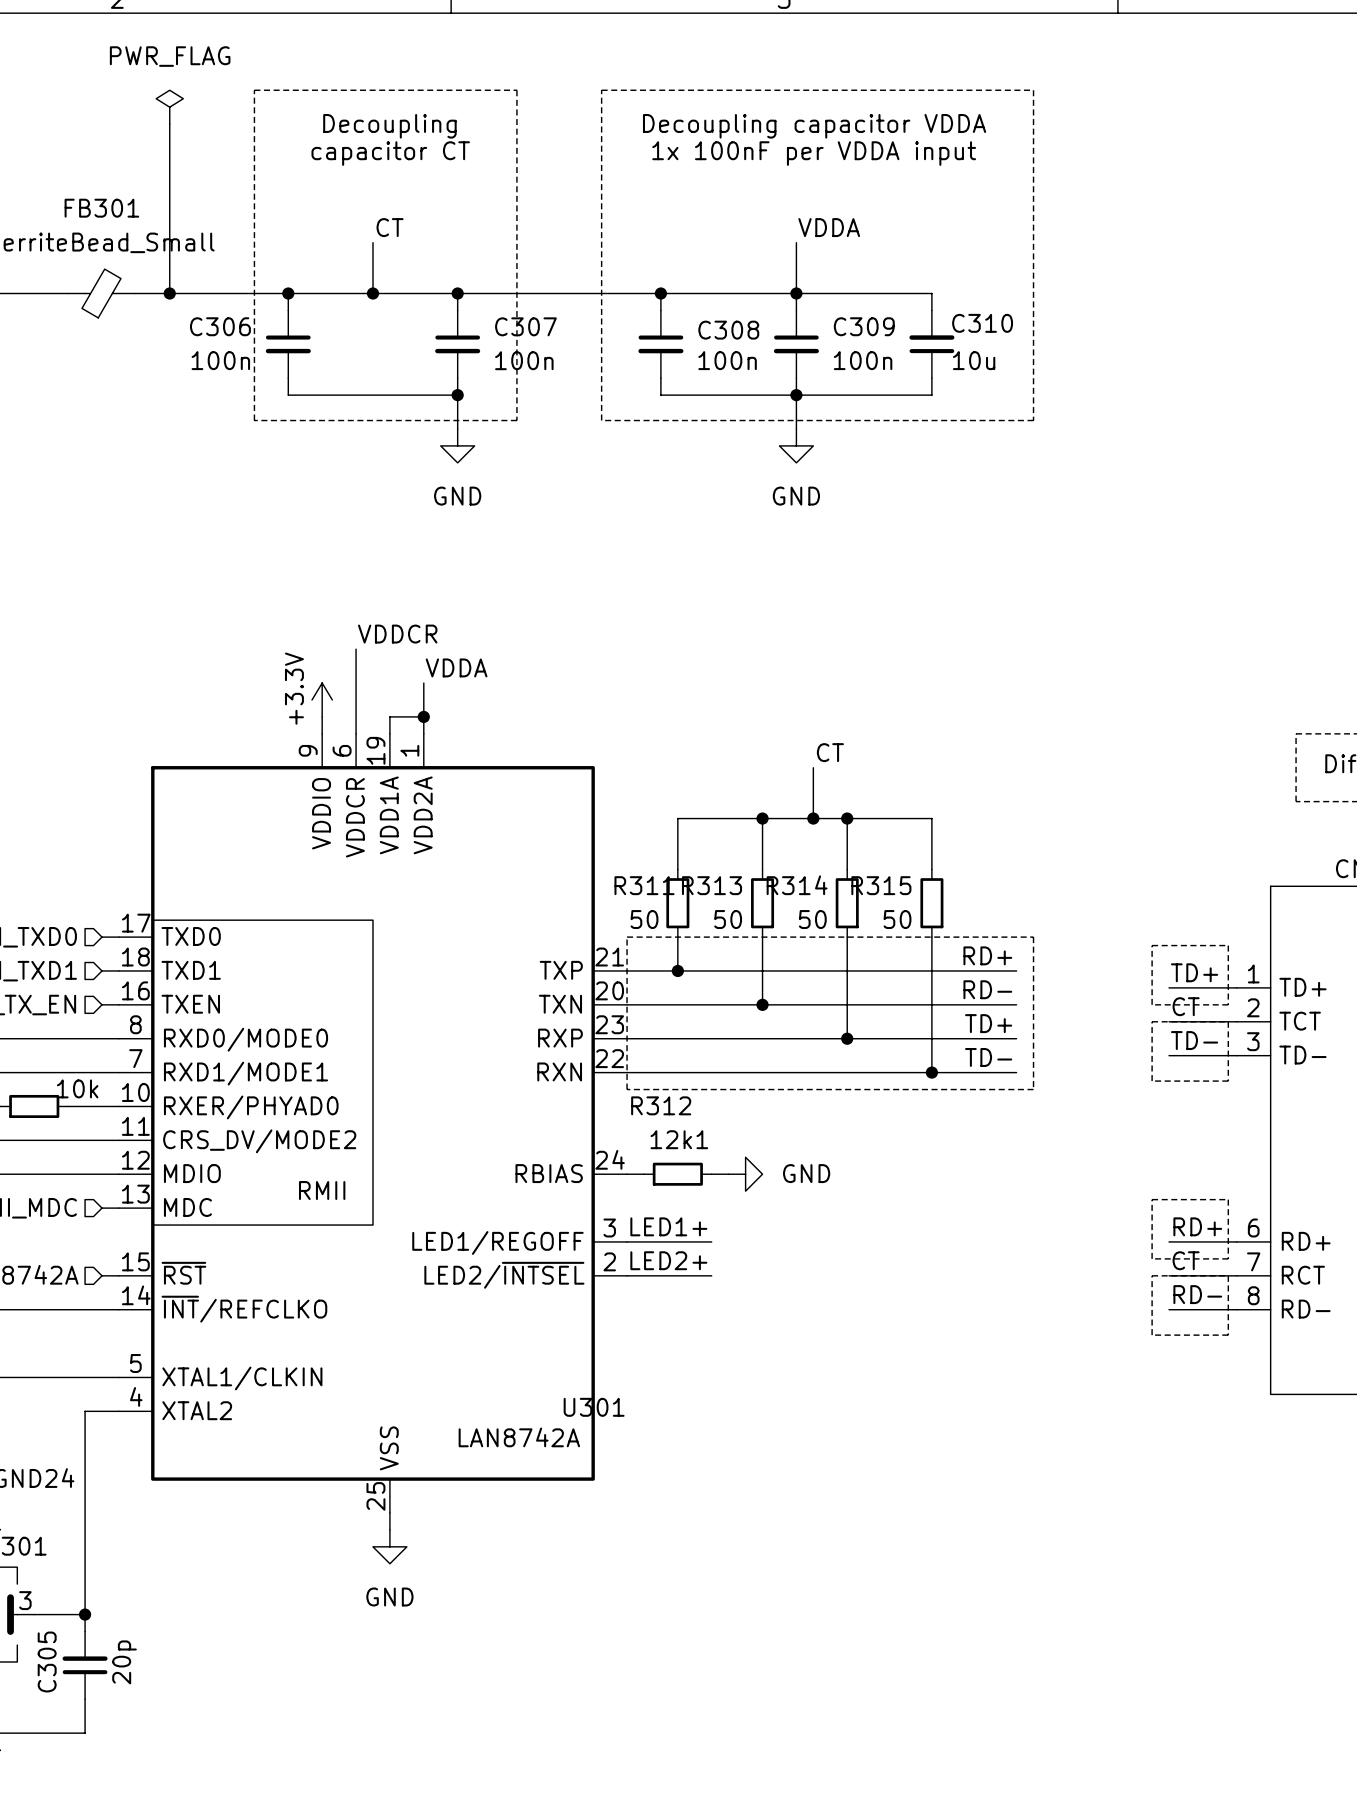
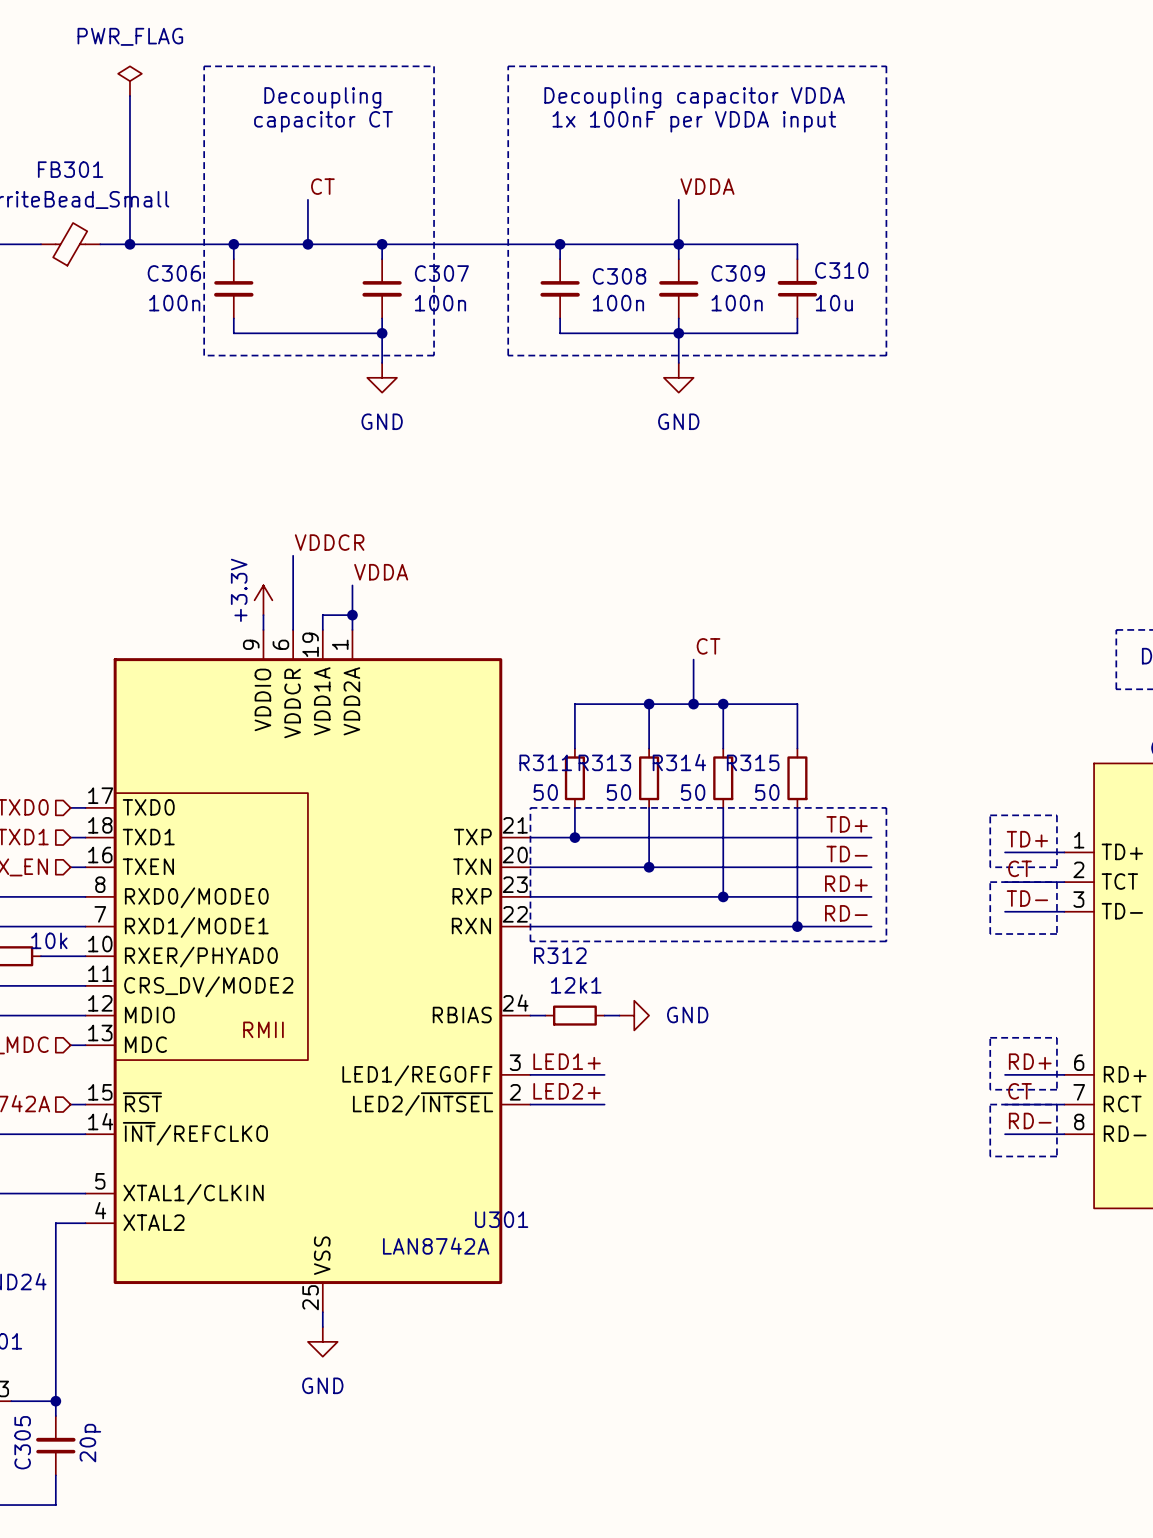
label: RD+ (987, 955) -> TD+ (847, 824)
label: RD- (987, 989) -> TD- (847, 854)
label: TD+ (988, 1023) -> RD+ (846, 883)
label: TD- (988, 1057) -> RD- (846, 913)

